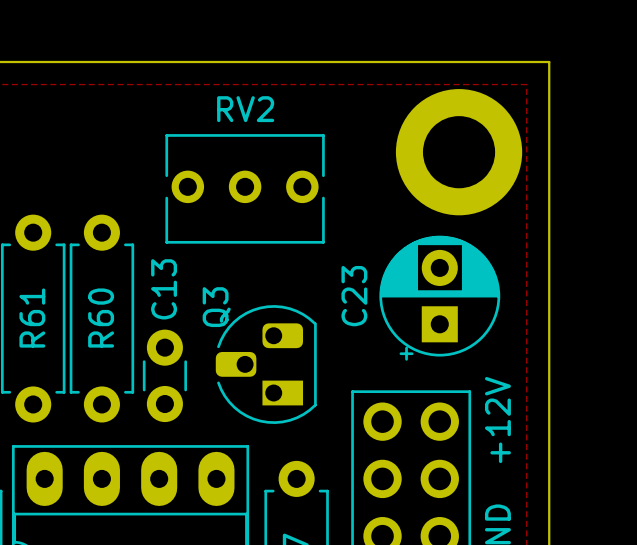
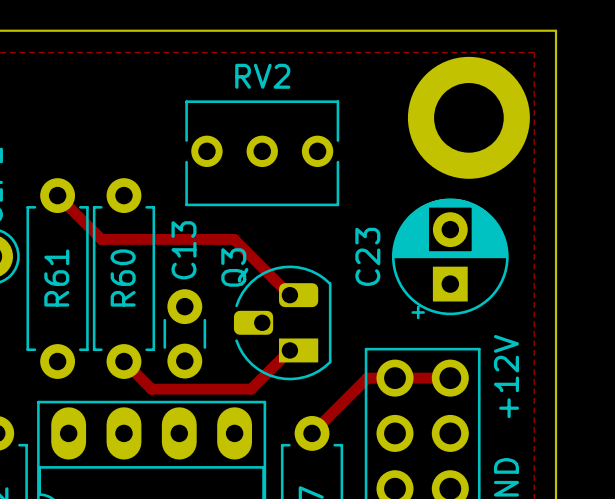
track: none -> (57, 195) (101, 239) (234, 239) (289, 295)
track: none -> (289, 350) (251, 389) (151, 389) (123, 361)
track: none -> (450, 378) (367, 378) (312, 433)

